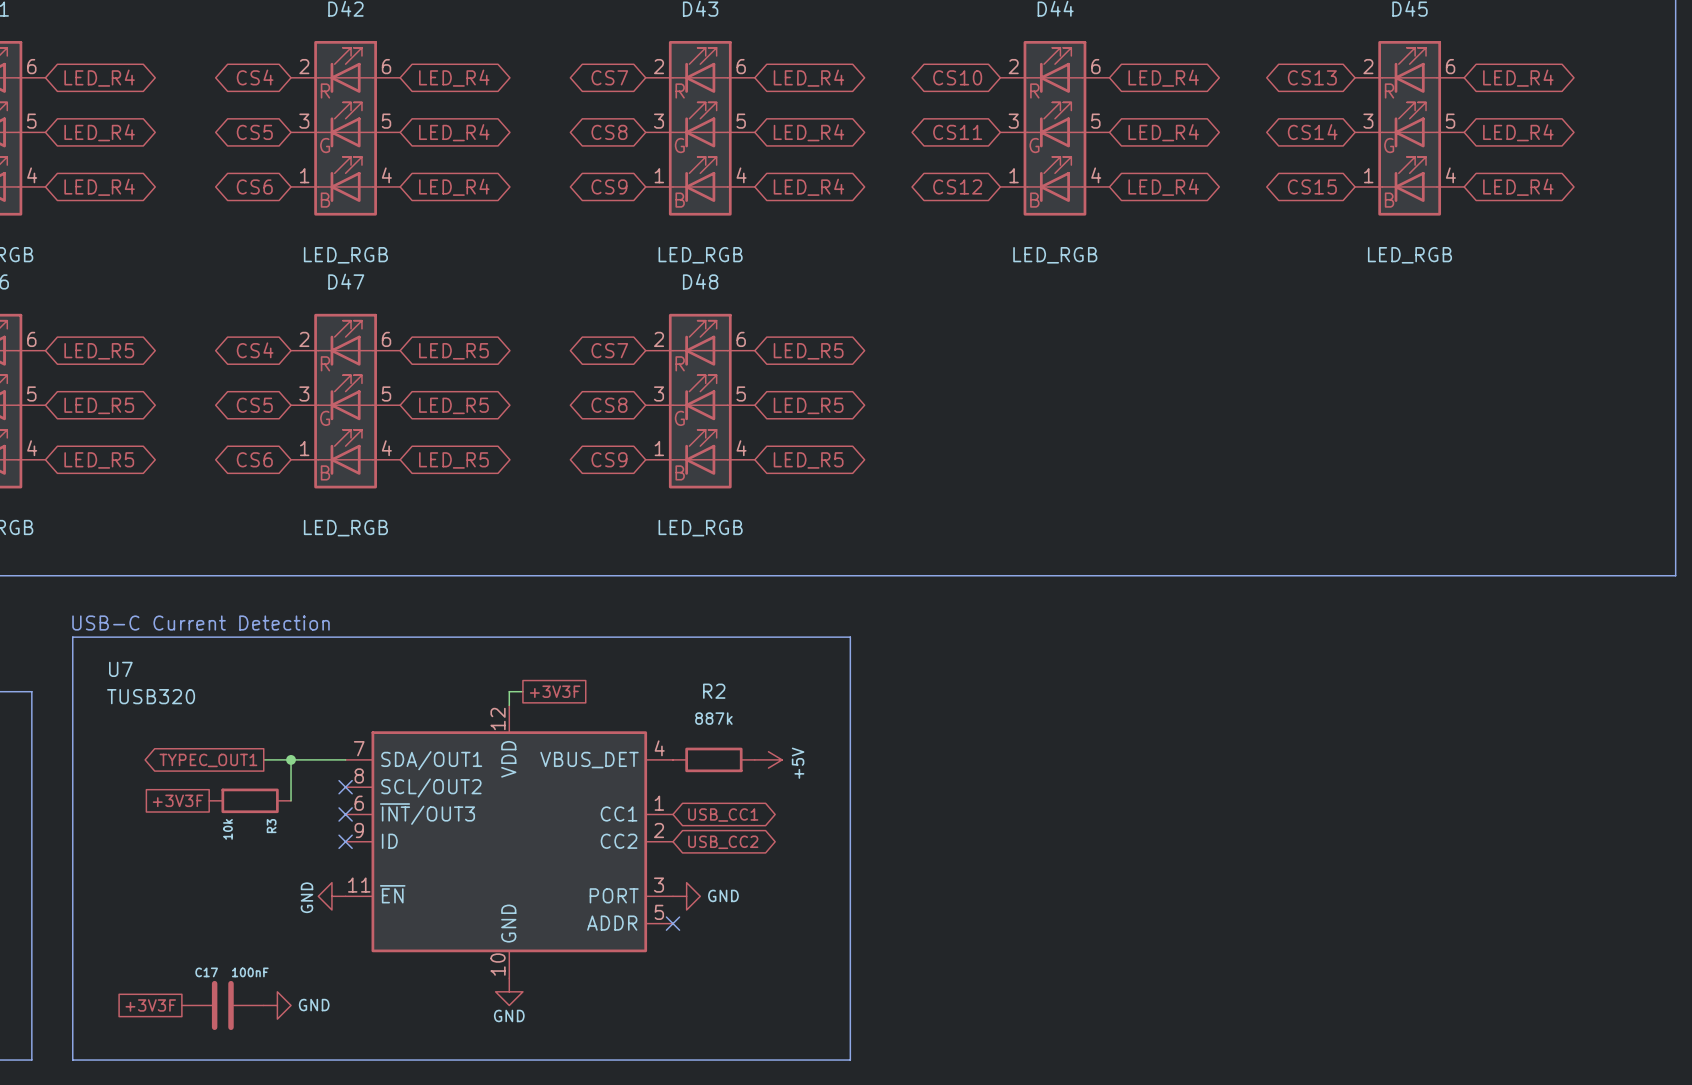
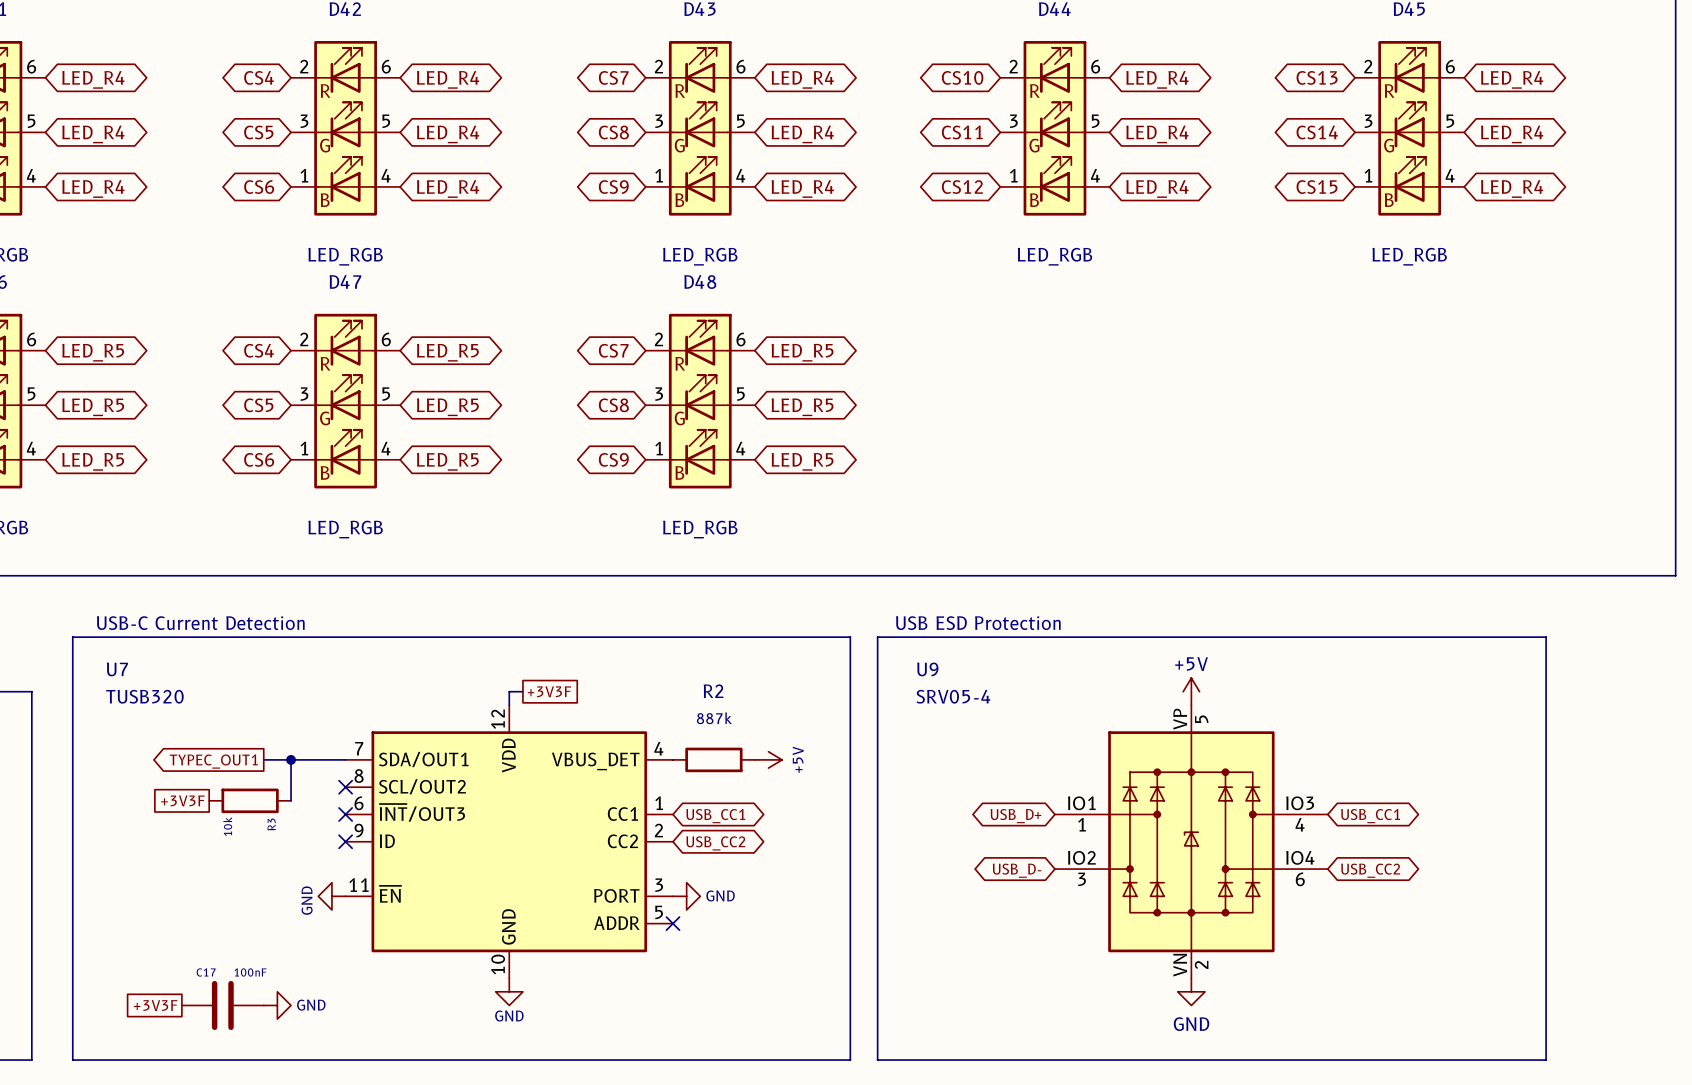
text: none -> USB ESD Protection (978, 623)
line: none -> (877, 637) (1546, 637) (1546, 1060) (877, 1060) (877, 637)
power symbol: none -> +5V (1191, 691)
global label: none -> USB_D+ (1015, 816)
global label: none -> USB_CC1 (1370, 816)
U9: none -> SRV05-4 (1191, 841)
global label: none -> USB_D- (1017, 870)
global label: none -> USB_CC2 (1370, 870)
power symbol: none -> GND (1191, 991)

